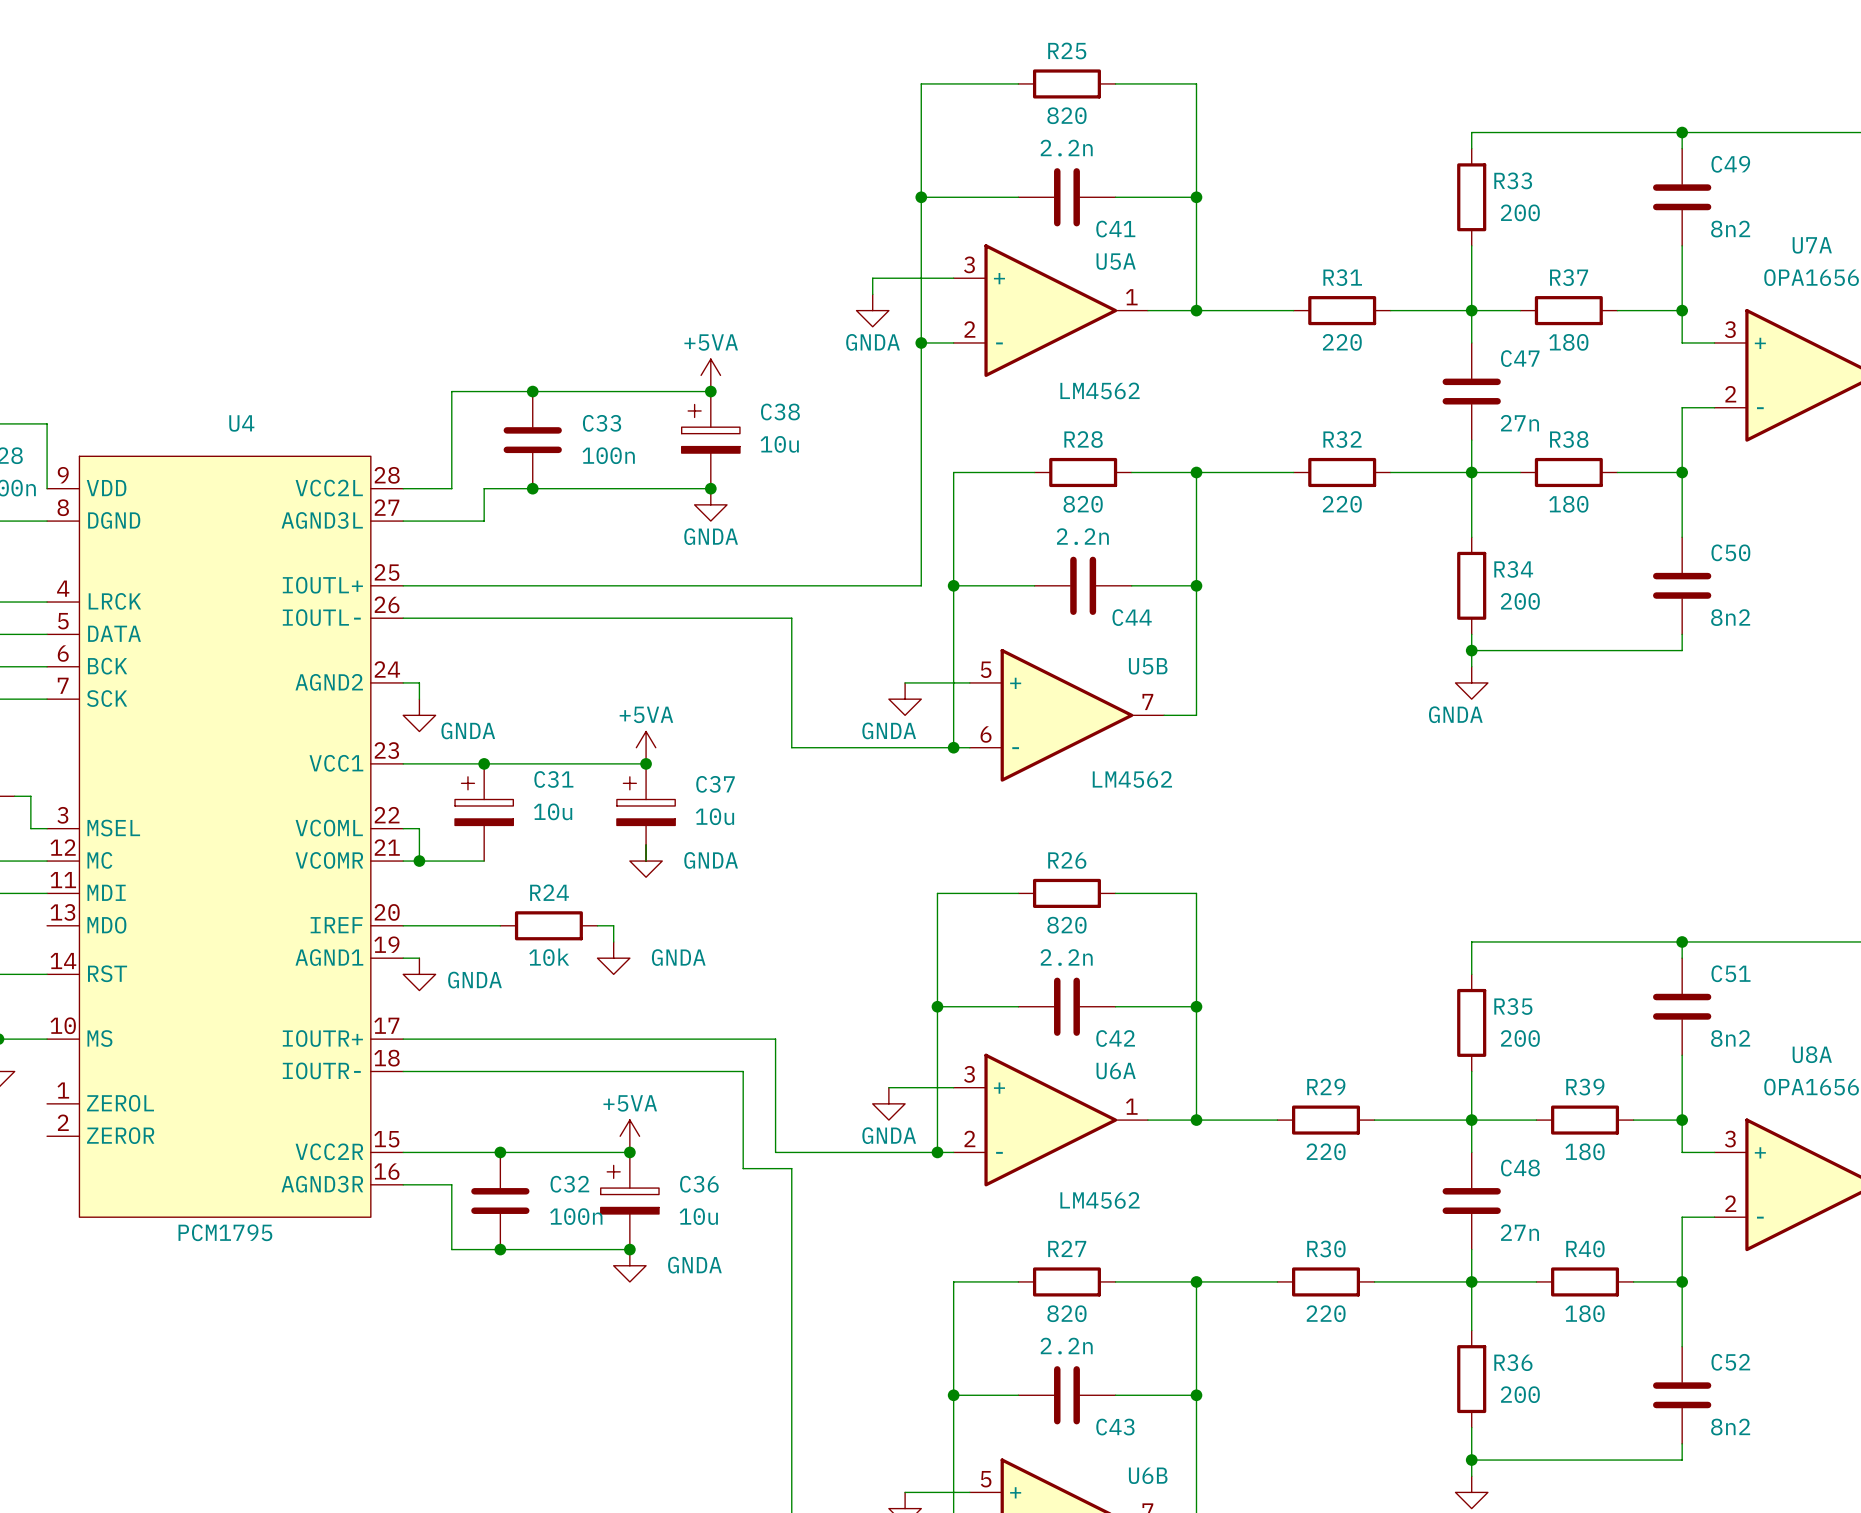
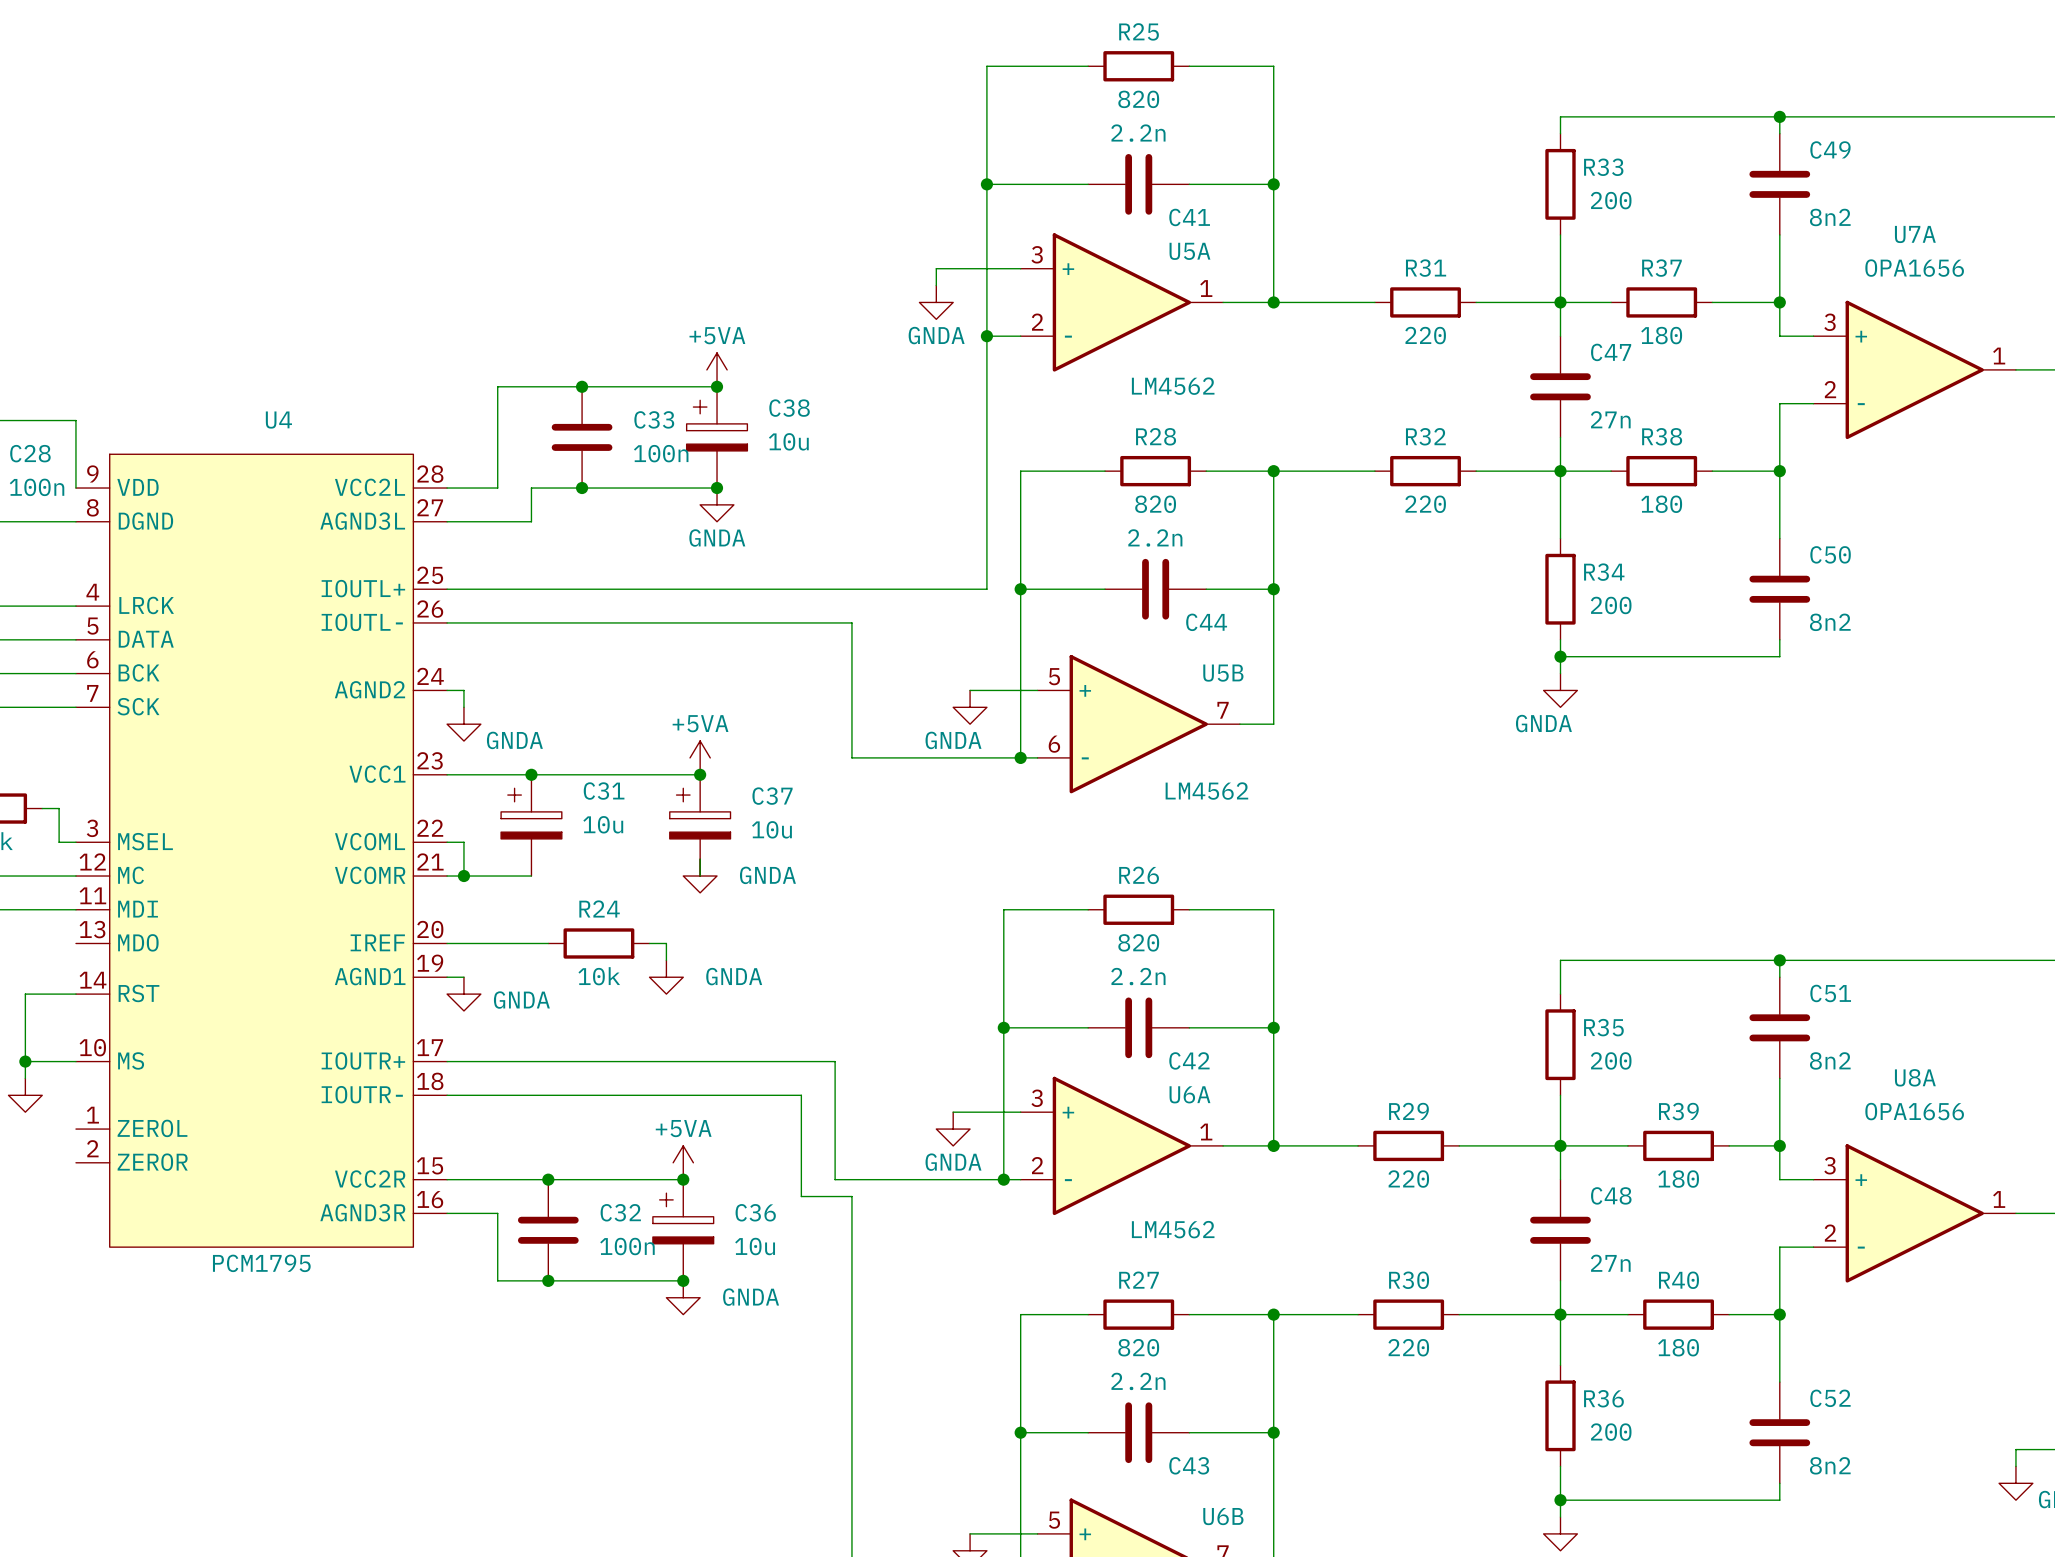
power symbol position: +5VA (710, 375) -> +5VA (717, 369)
wire: (662, 391) (710, 391) -> none
junction position: (710, 391) -> (717, 386)
C38 position: (710, 440) -> (717, 437)
wire: (662, 488) (710, 488) -> none
junction position: (710, 488) -> (717, 488)
power symbol position: GNDA (710, 504) -> GNDA (717, 504)

